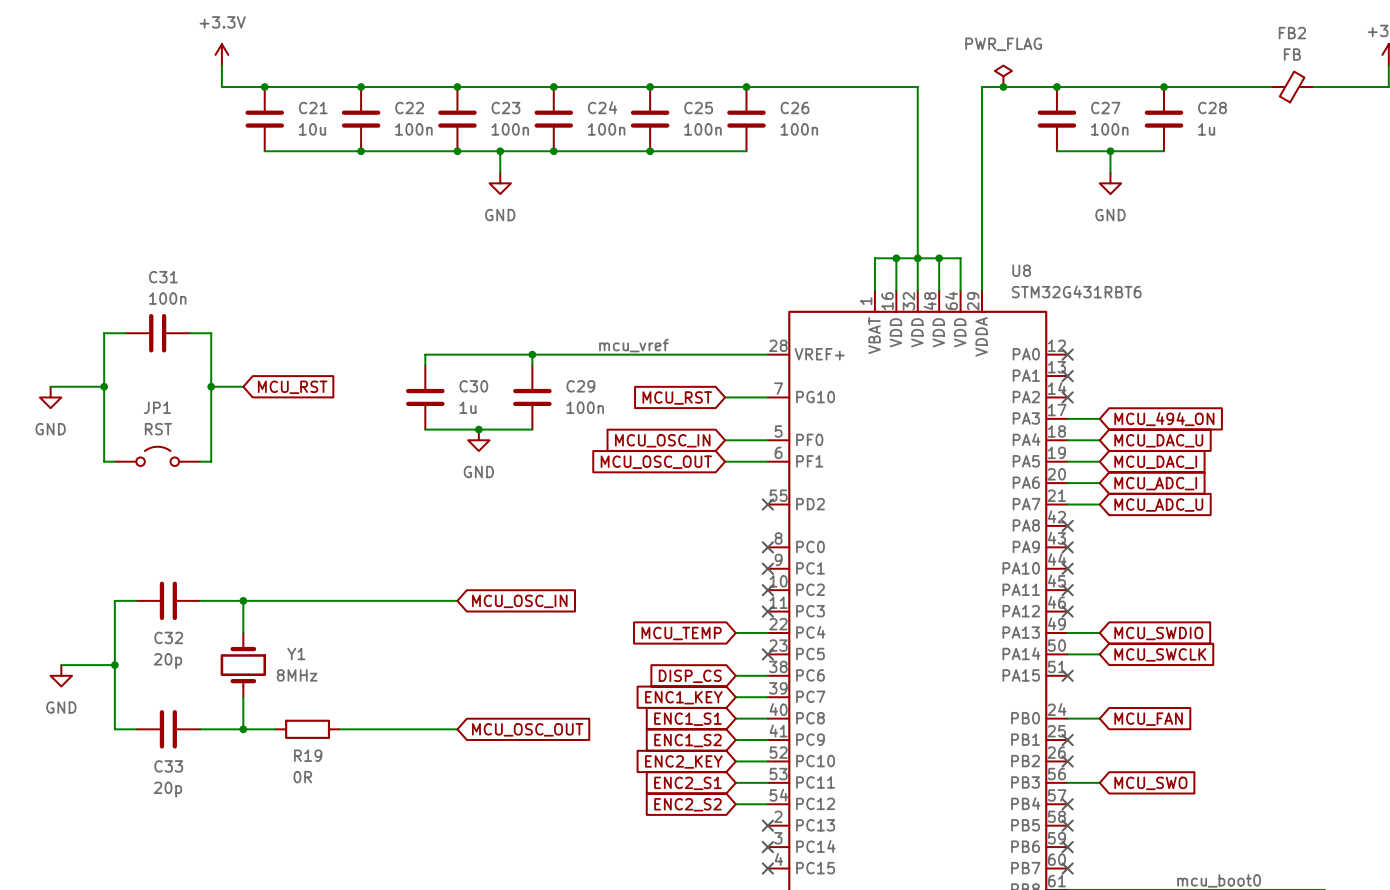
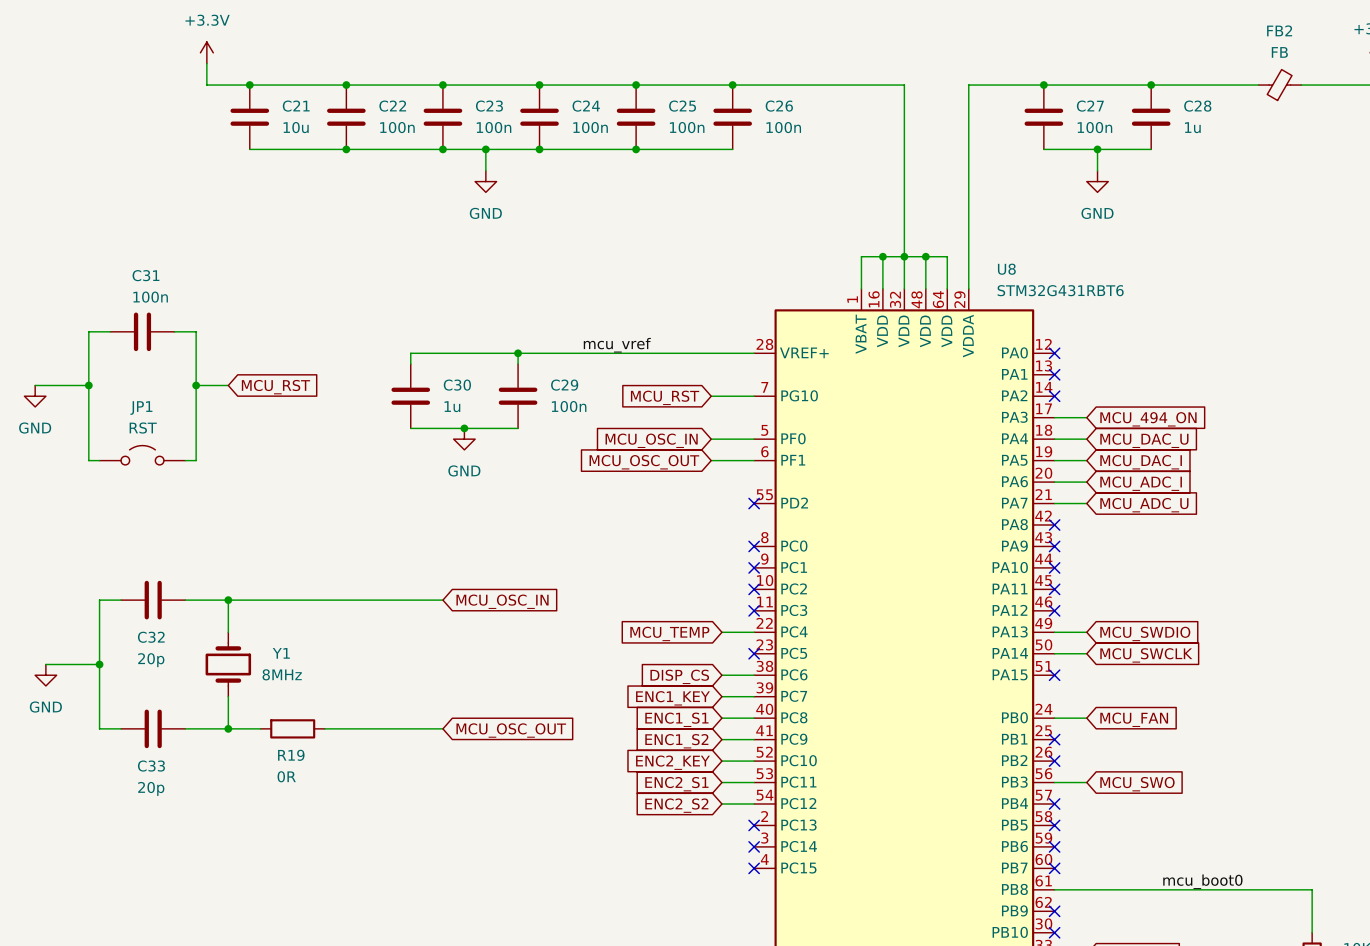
power symbol: PWR_FLAG (1003, 76) -> none
junction: (1003, 87) -> none

